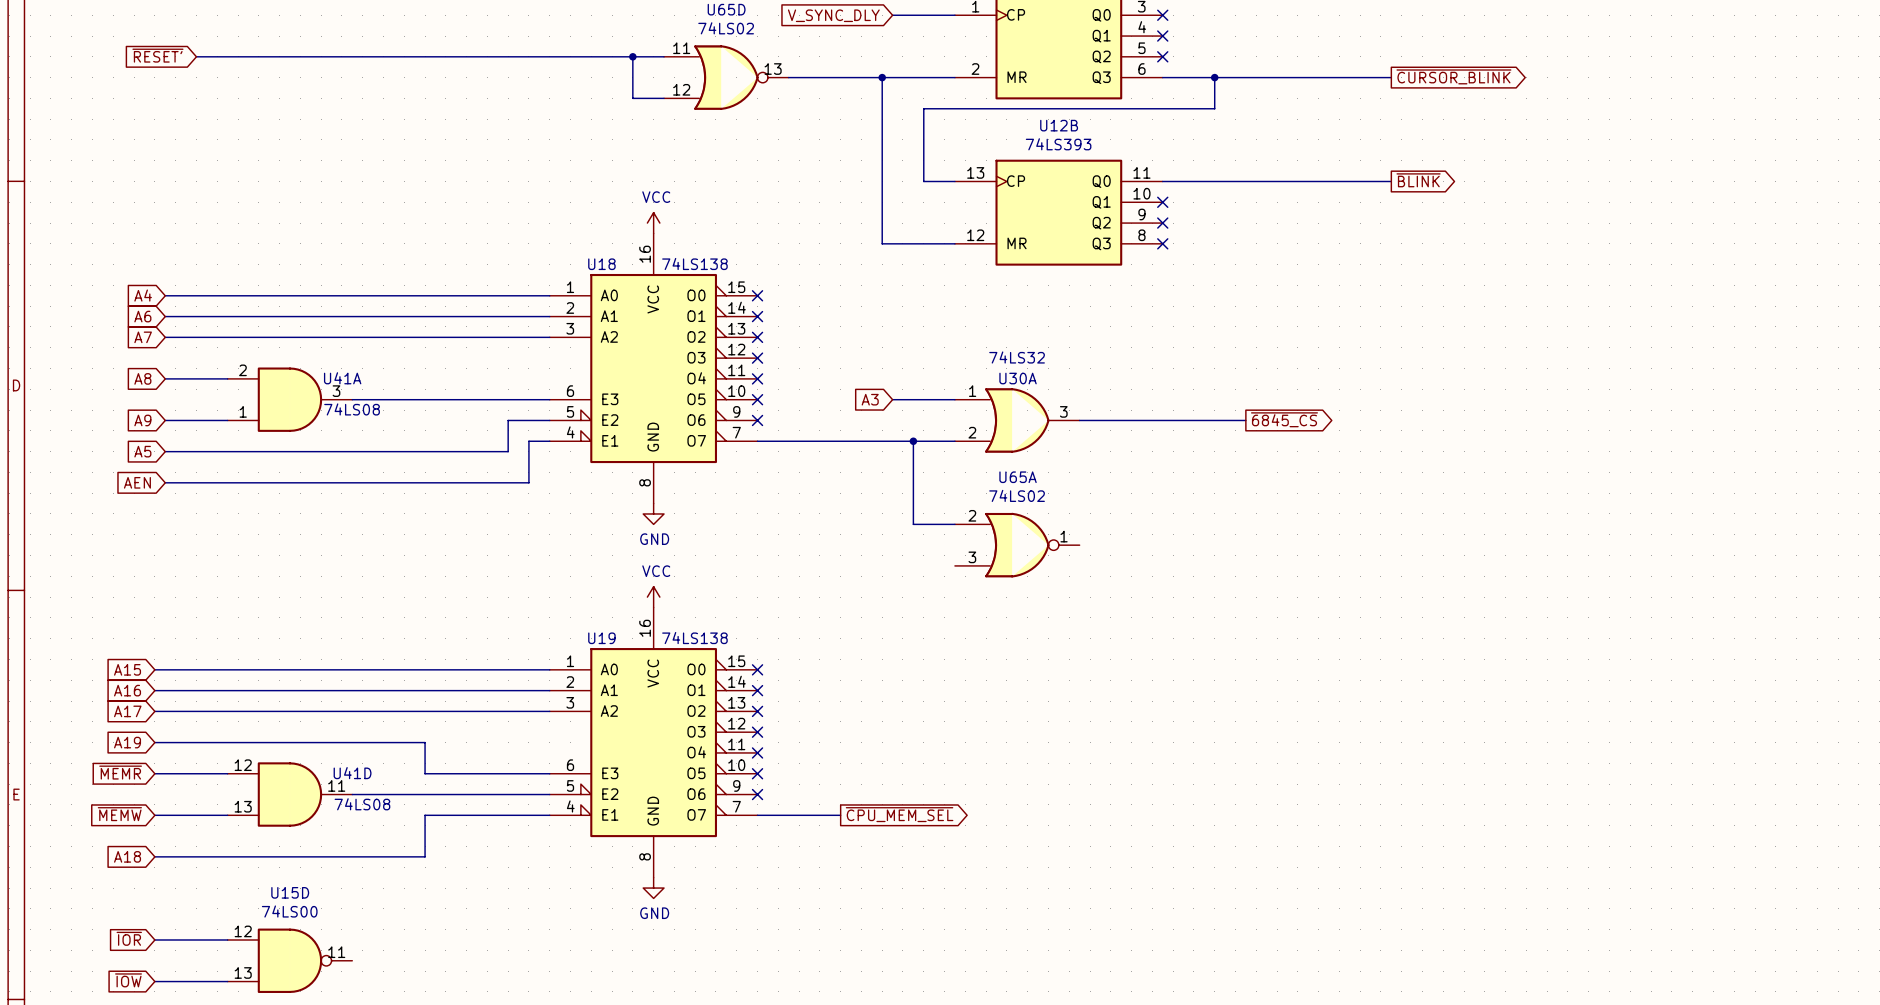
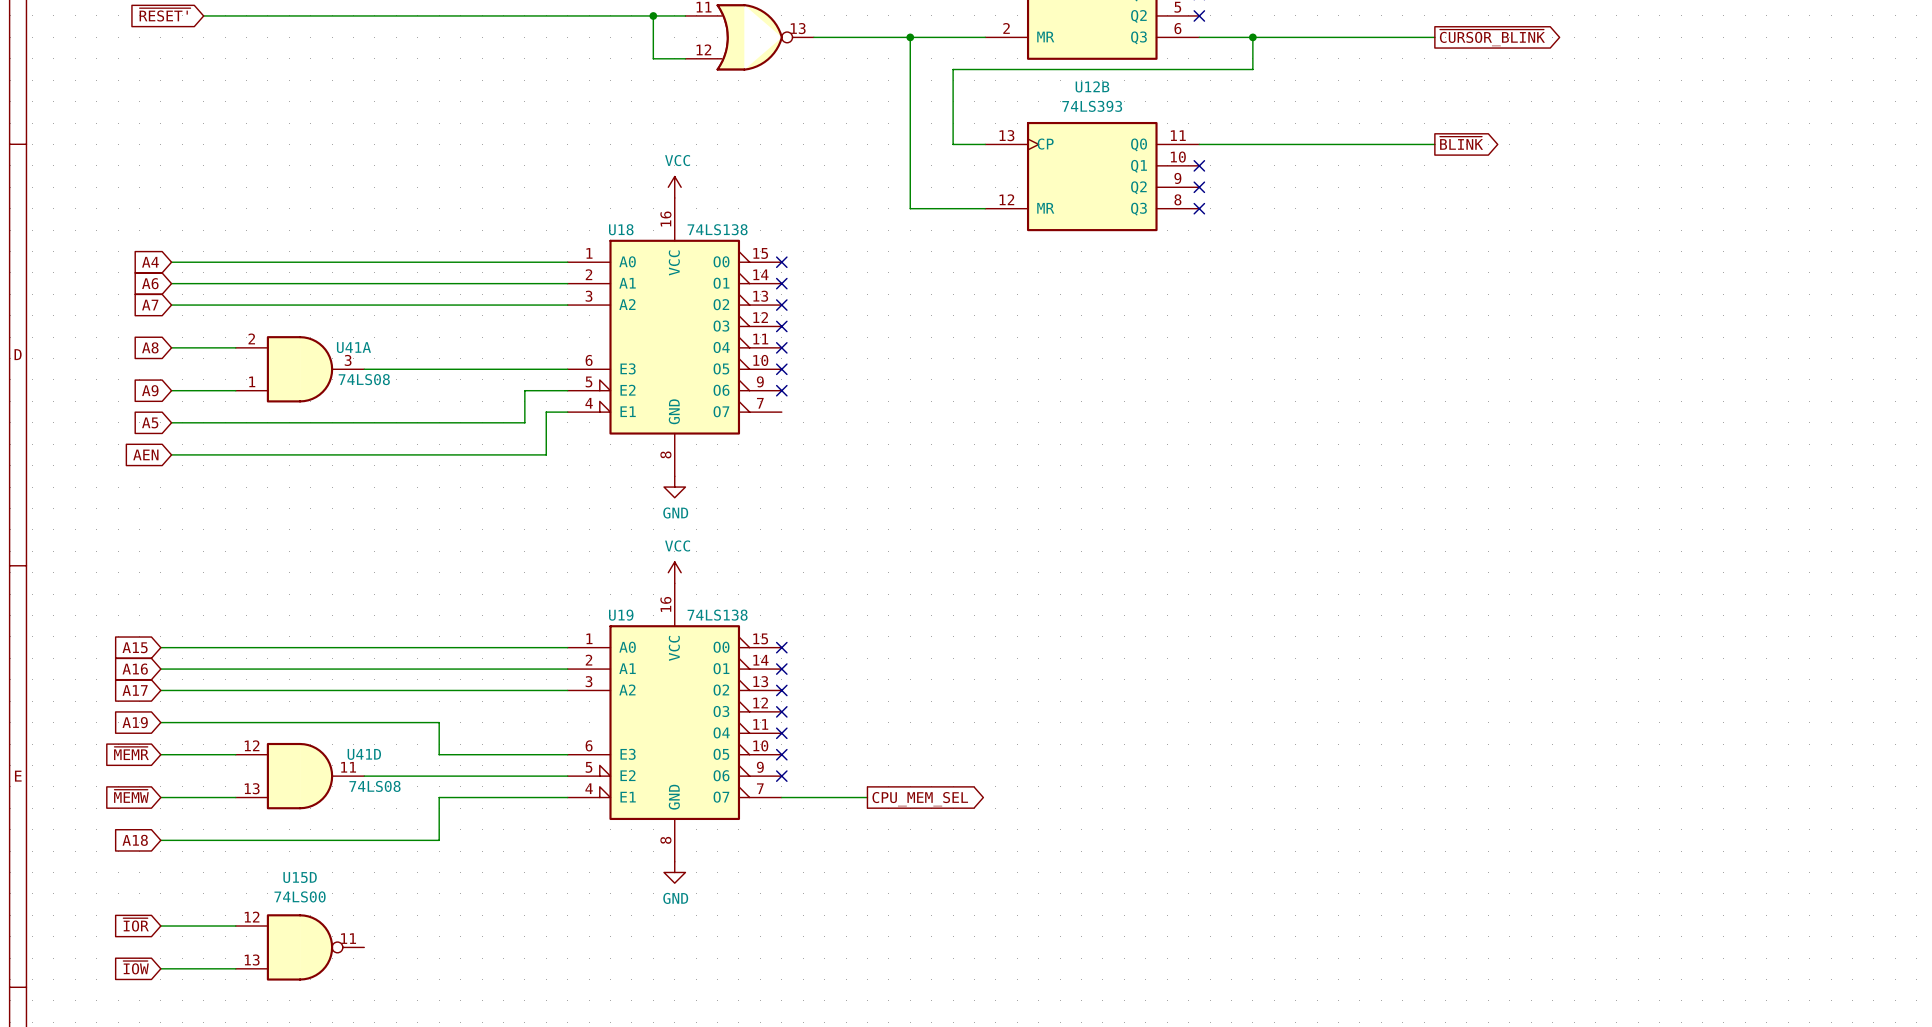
global label: A3 (870, 399) -> none
wire: (892, 399) (954, 399) -> none
global label: ~{6845_CS} (1284, 419) -> none
U30A: 74LS32 (1017, 420) -> none
wire: (1079, 420) (1245, 420) -> none
wire: (757, 441) (954, 441) -> none
wire: (913, 441) (913, 524) (954, 524) -> none
junction: (913, 441) -> none
U65A: 74LS02 (1017, 545) -> none
global label: ~{CPU_MEM_SEL} (899, 814) -> CPU_MEM_SEL (920, 799)

